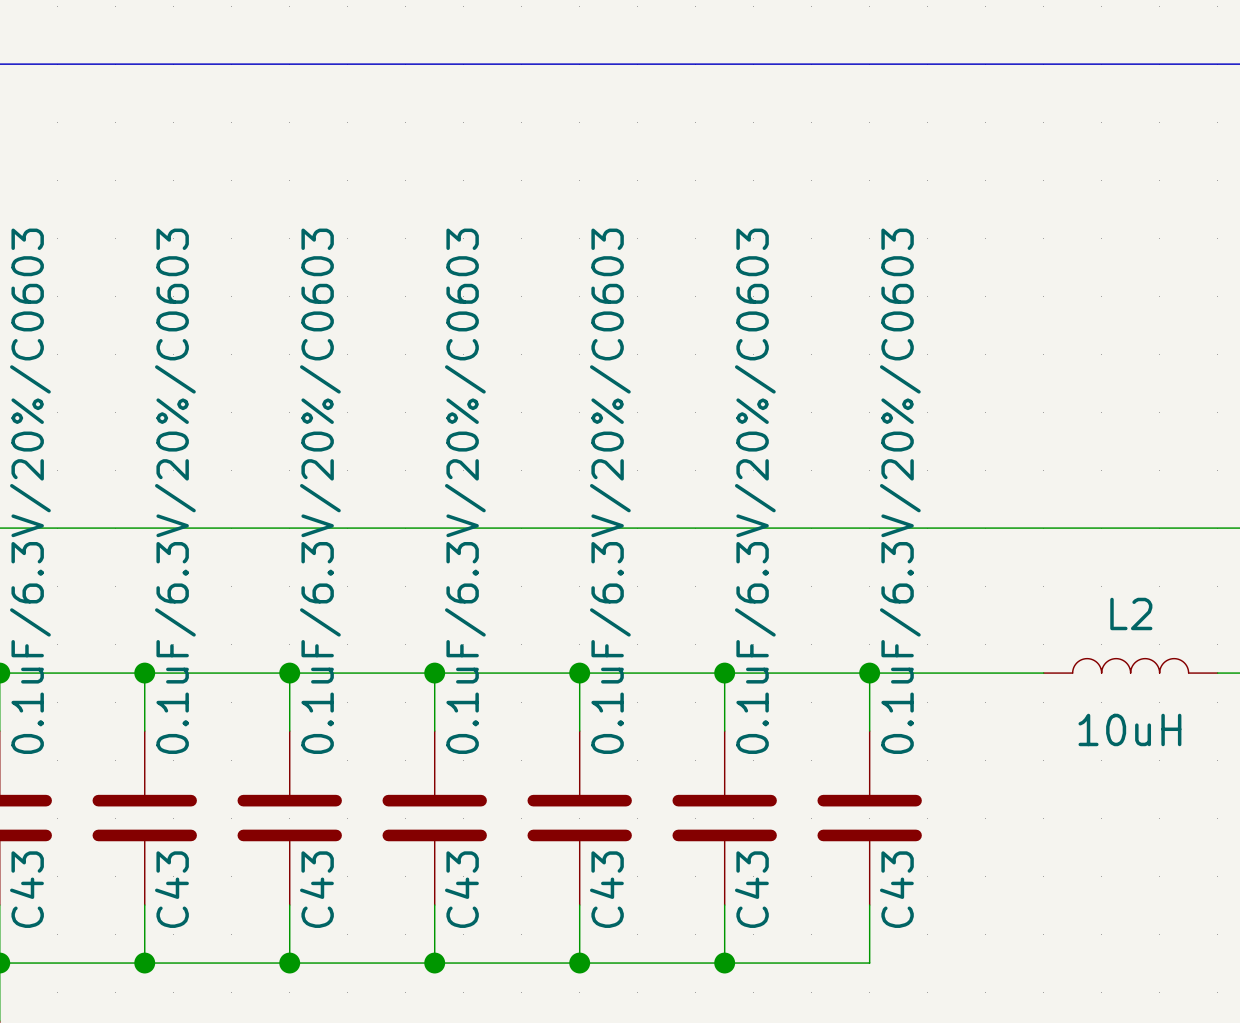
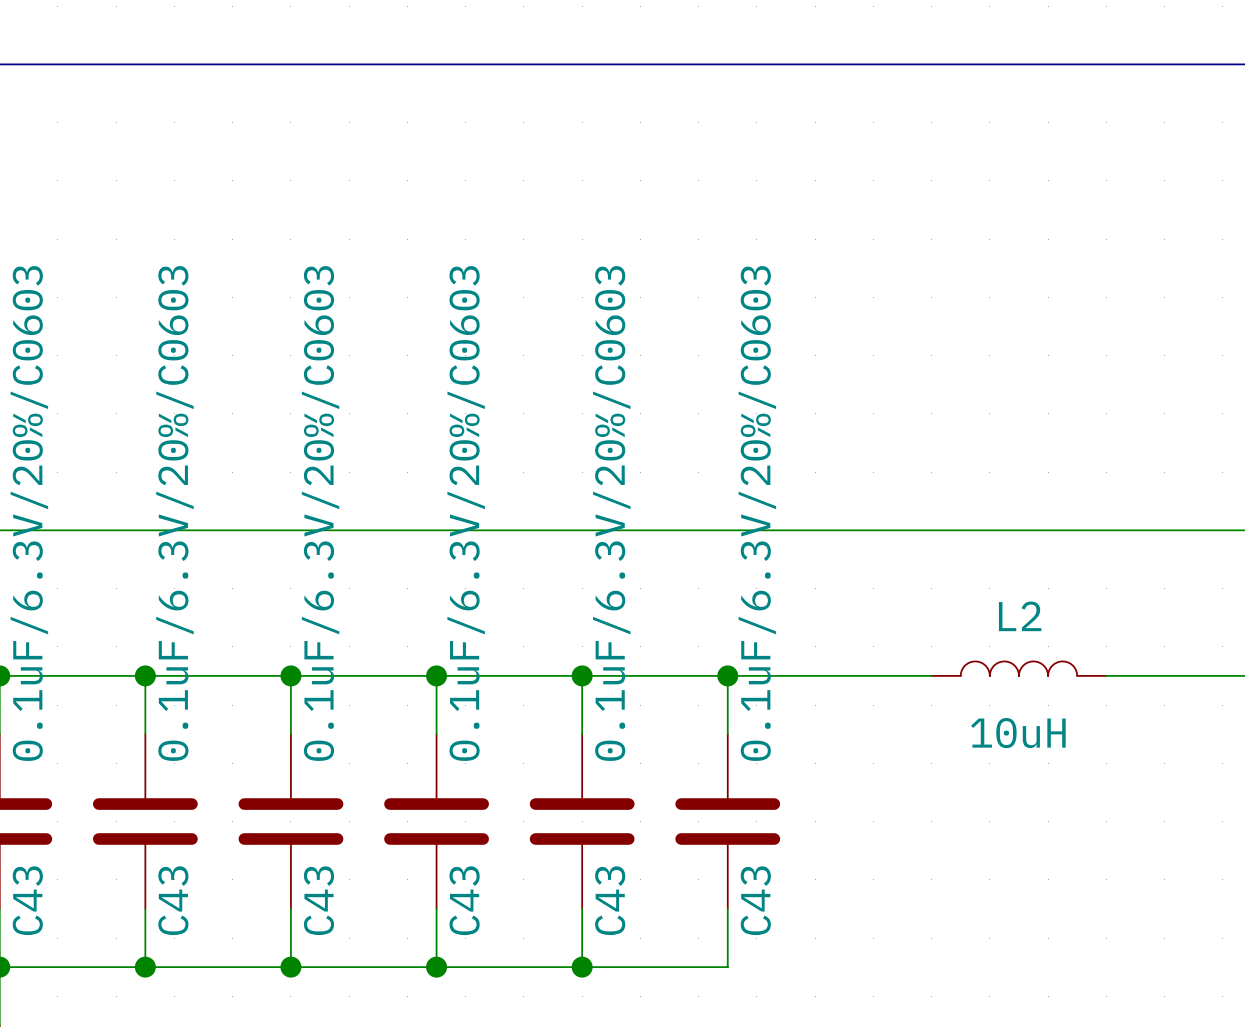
L2 position: (1130, 665) -> (1018, 668)
wire: (869, 673) (869, 731) -> none
junction: (869, 673) -> none
wire: (927, 673) (1043, 673) -> (1106, 675) (1222, 675)
C43: 0.1uF/6.3V/20%/C0603 (869, 818) -> none
wire: (869, 905) (869, 963) (724, 963) -> none
junction: (724, 963) -> none

